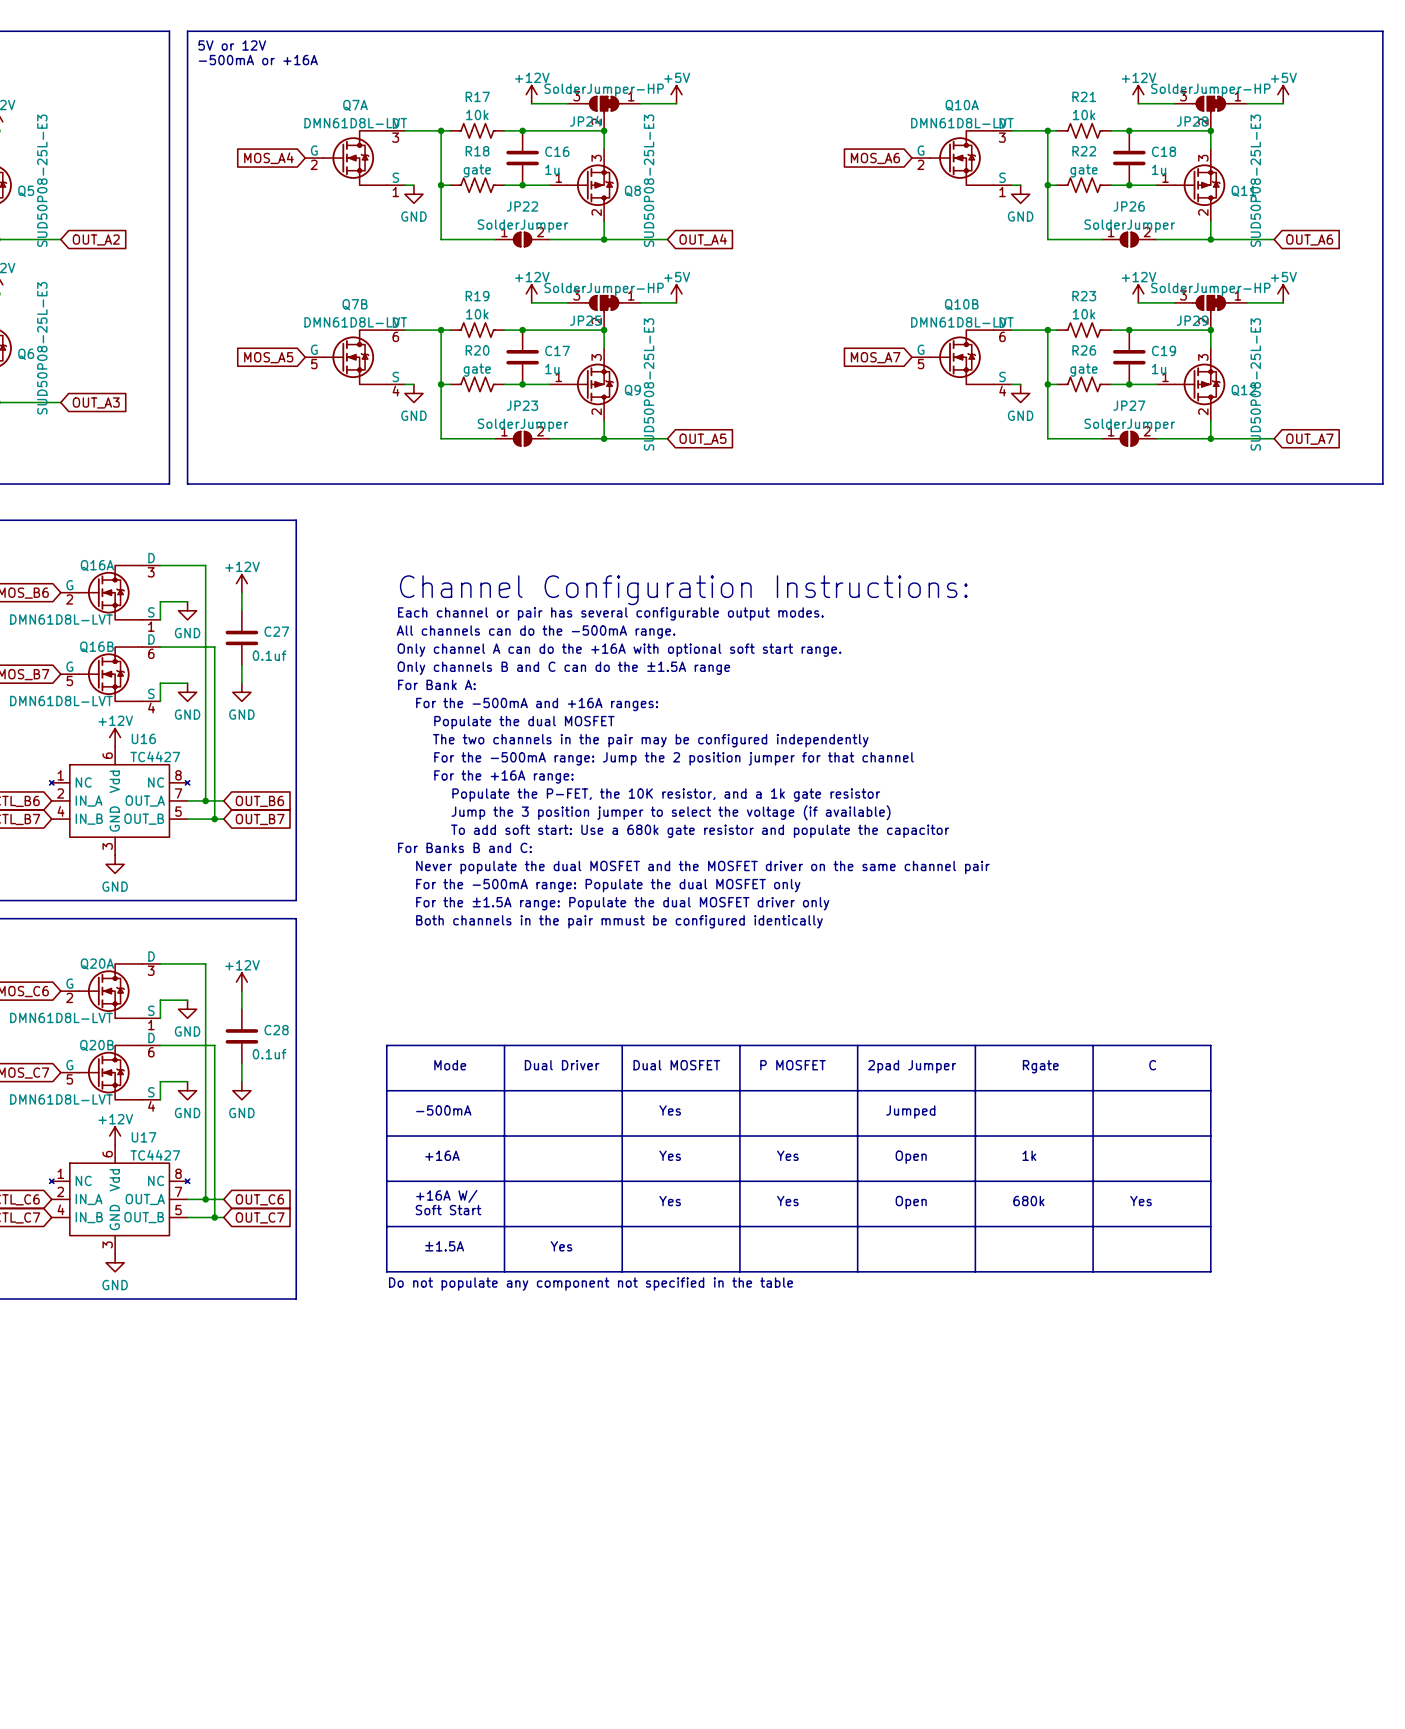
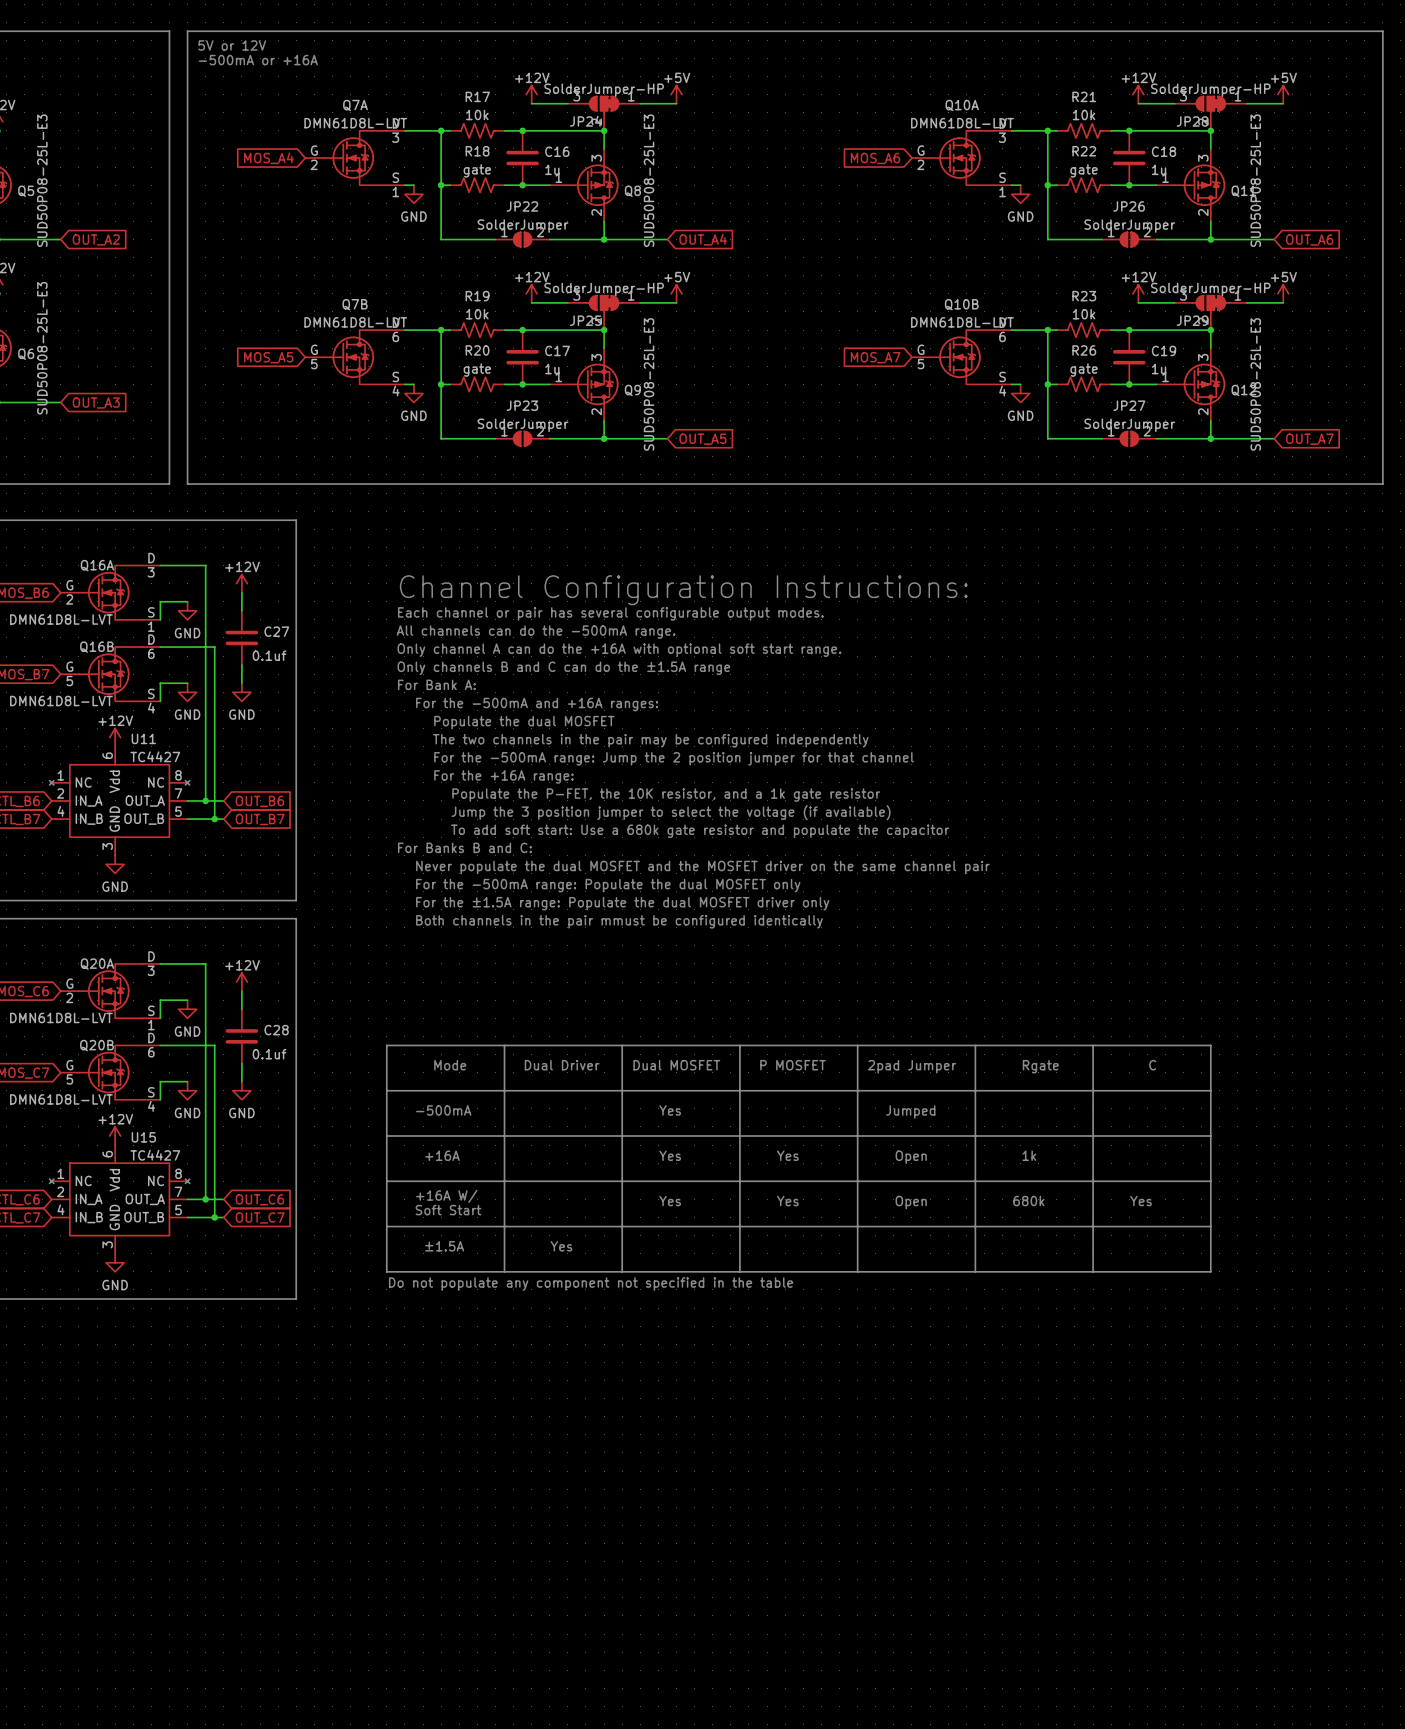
U16 name: U16 (143, 738) -> U11 (143, 738)
U17 name: U17 (144, 1137) -> U15 (143, 1137)

